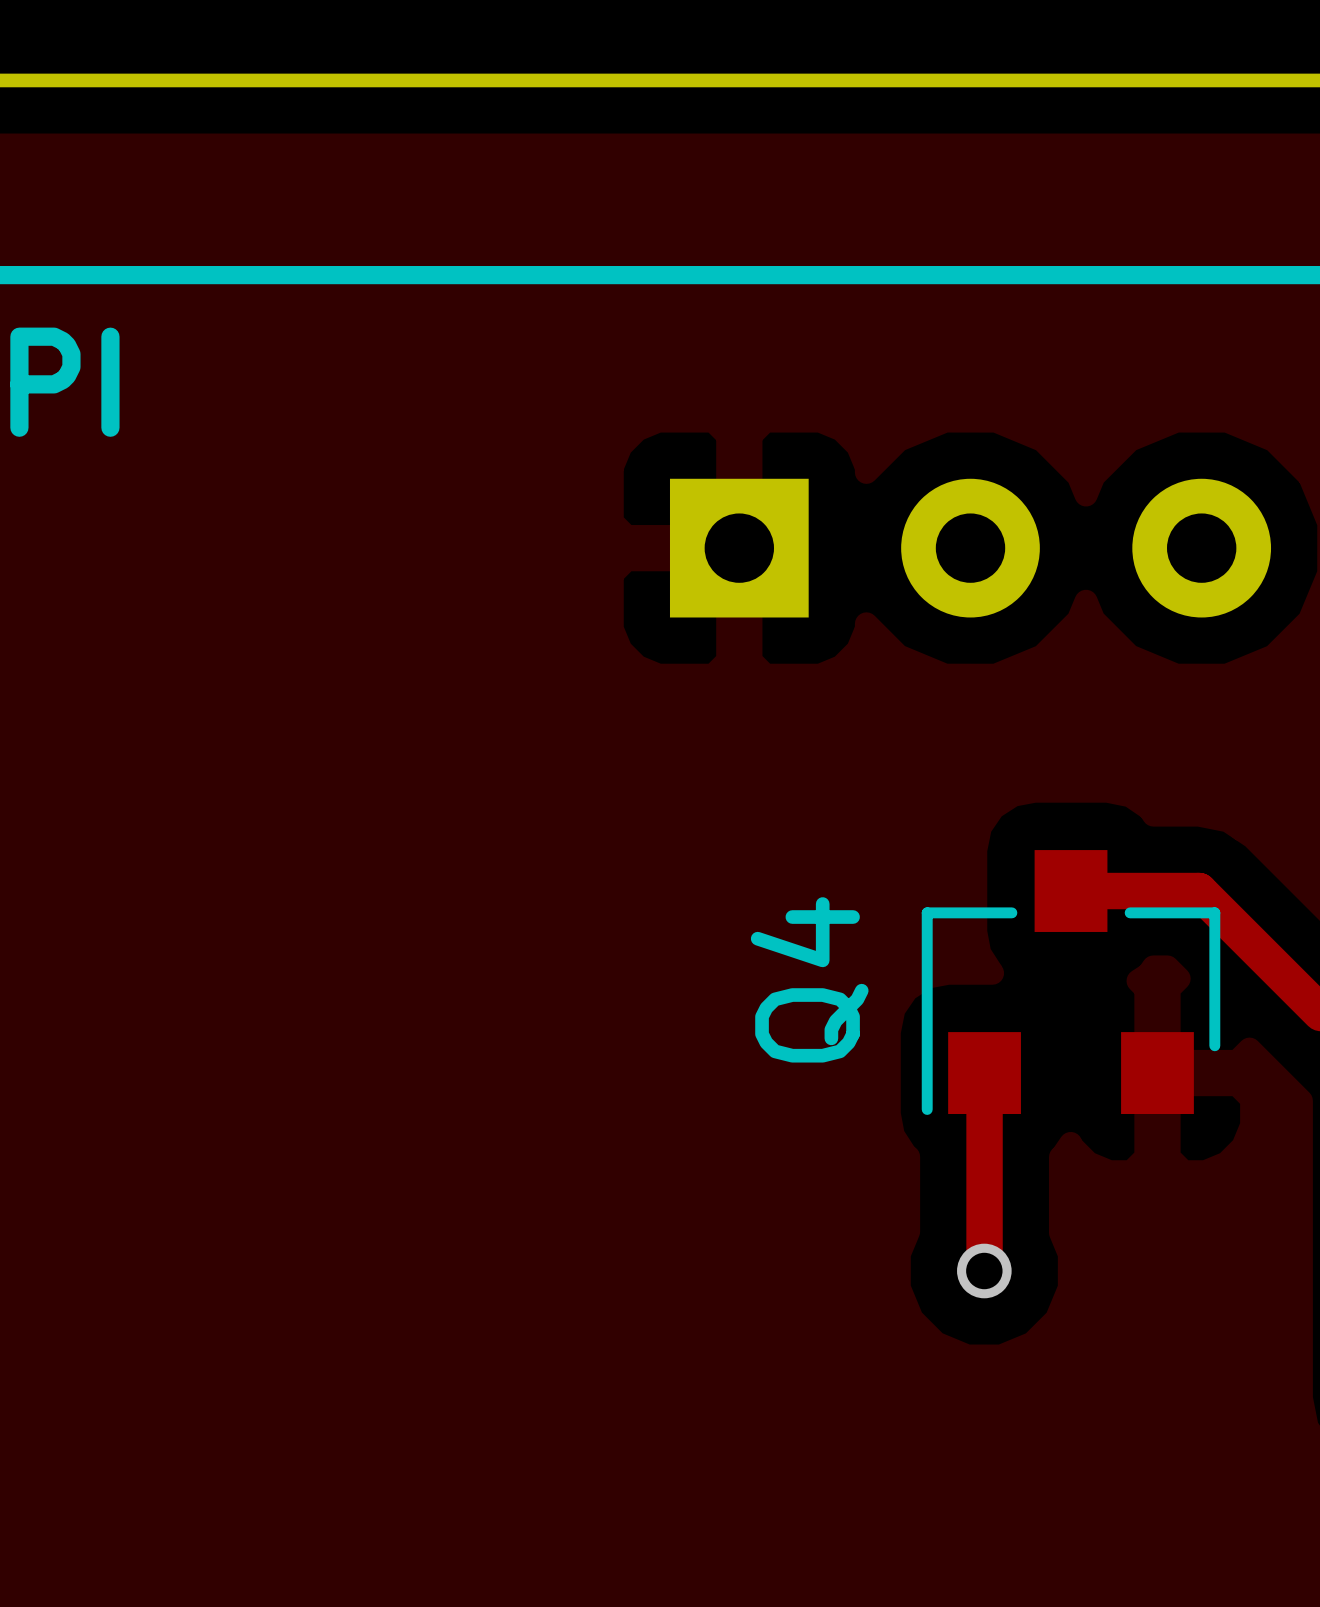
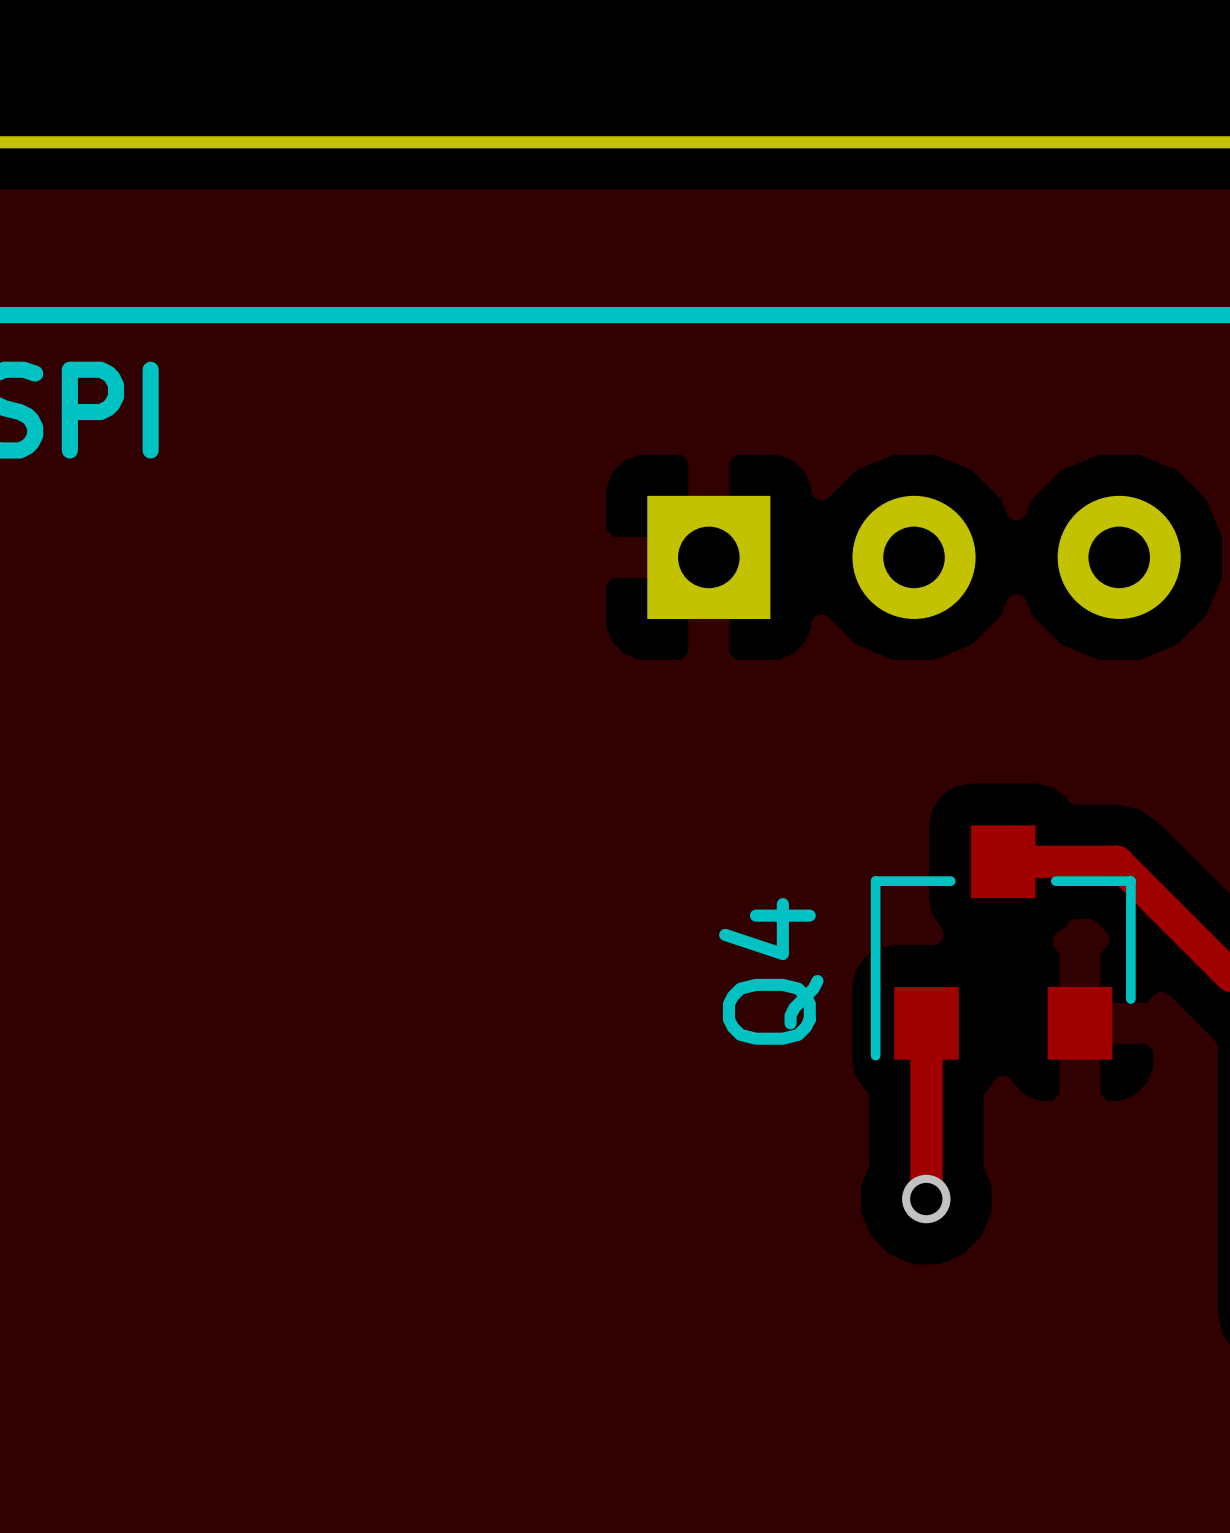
Q4 name position: Q4 (809, 979) -> Q4 (771, 971)

